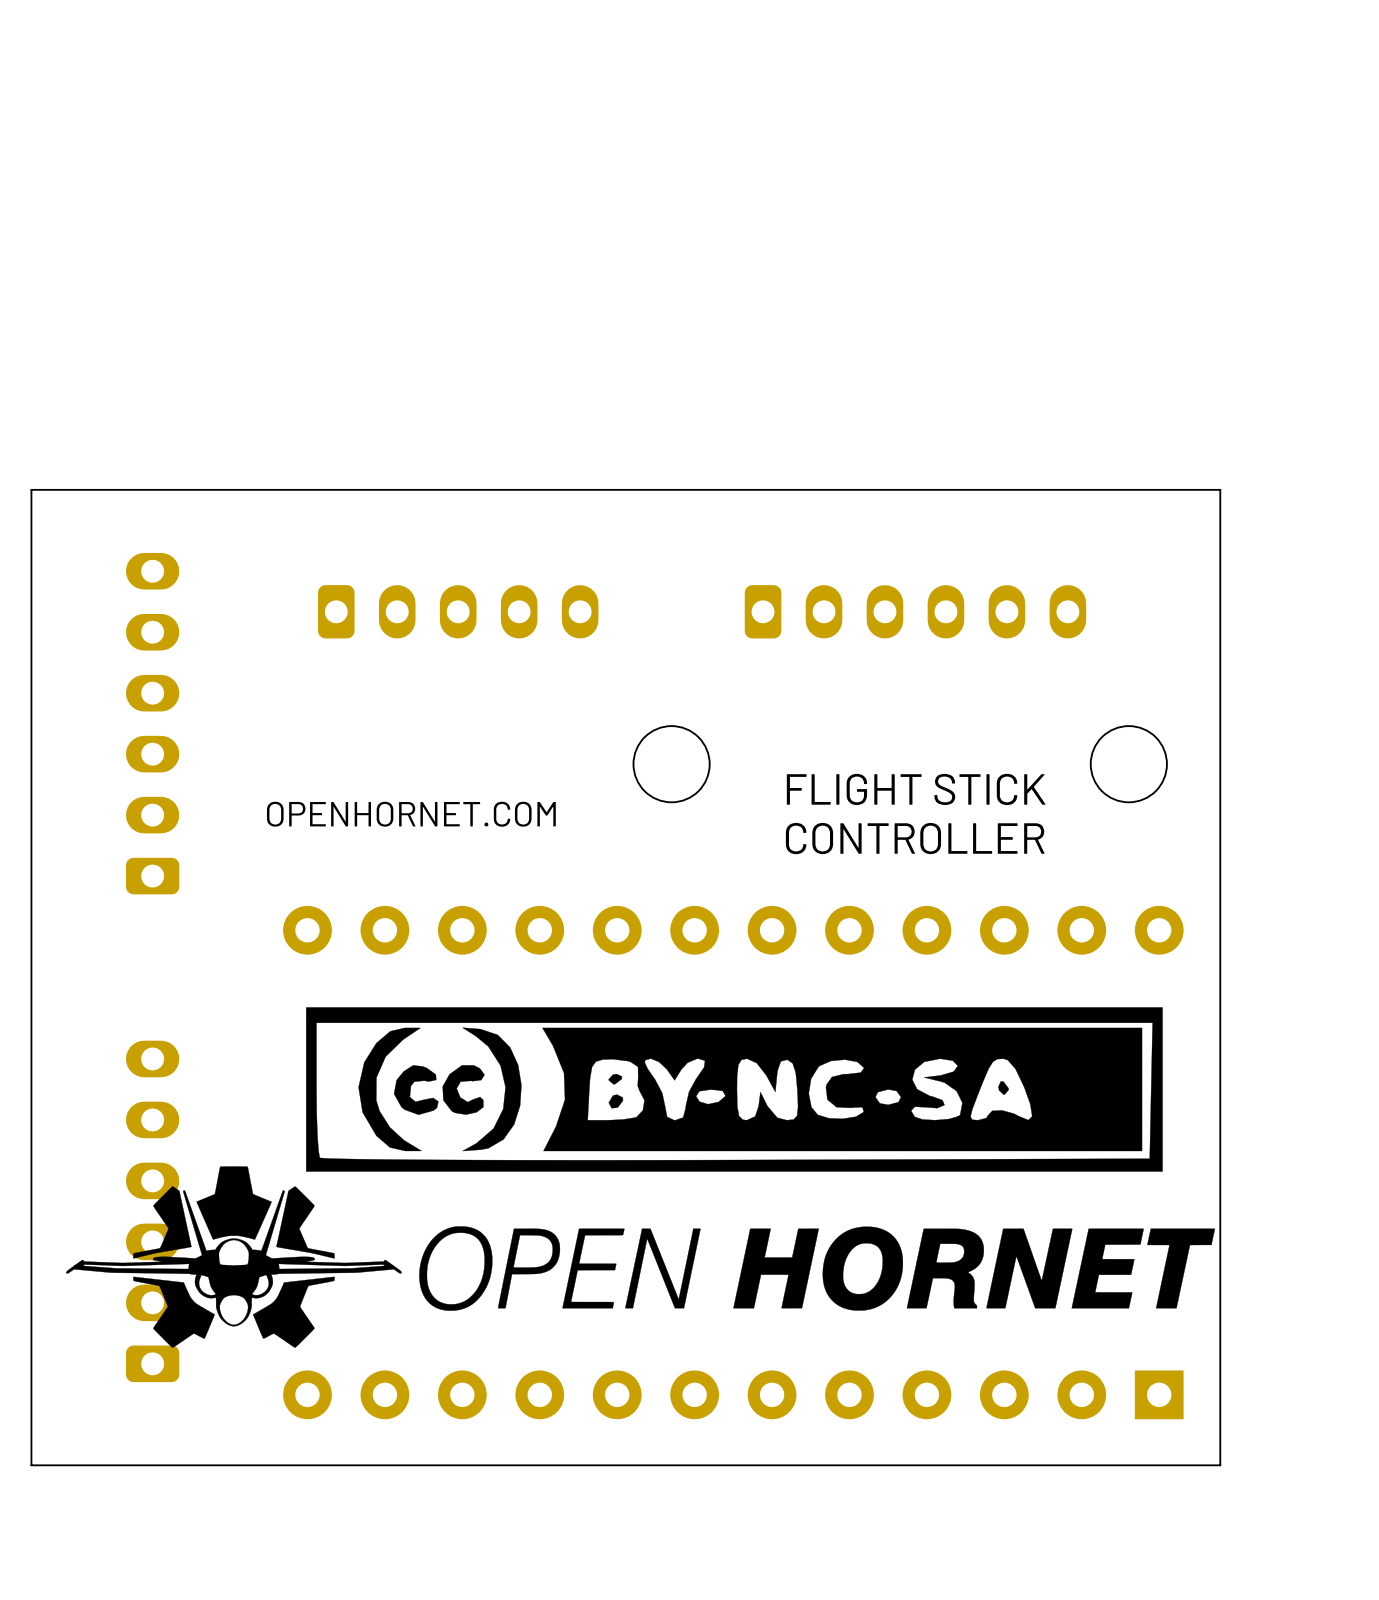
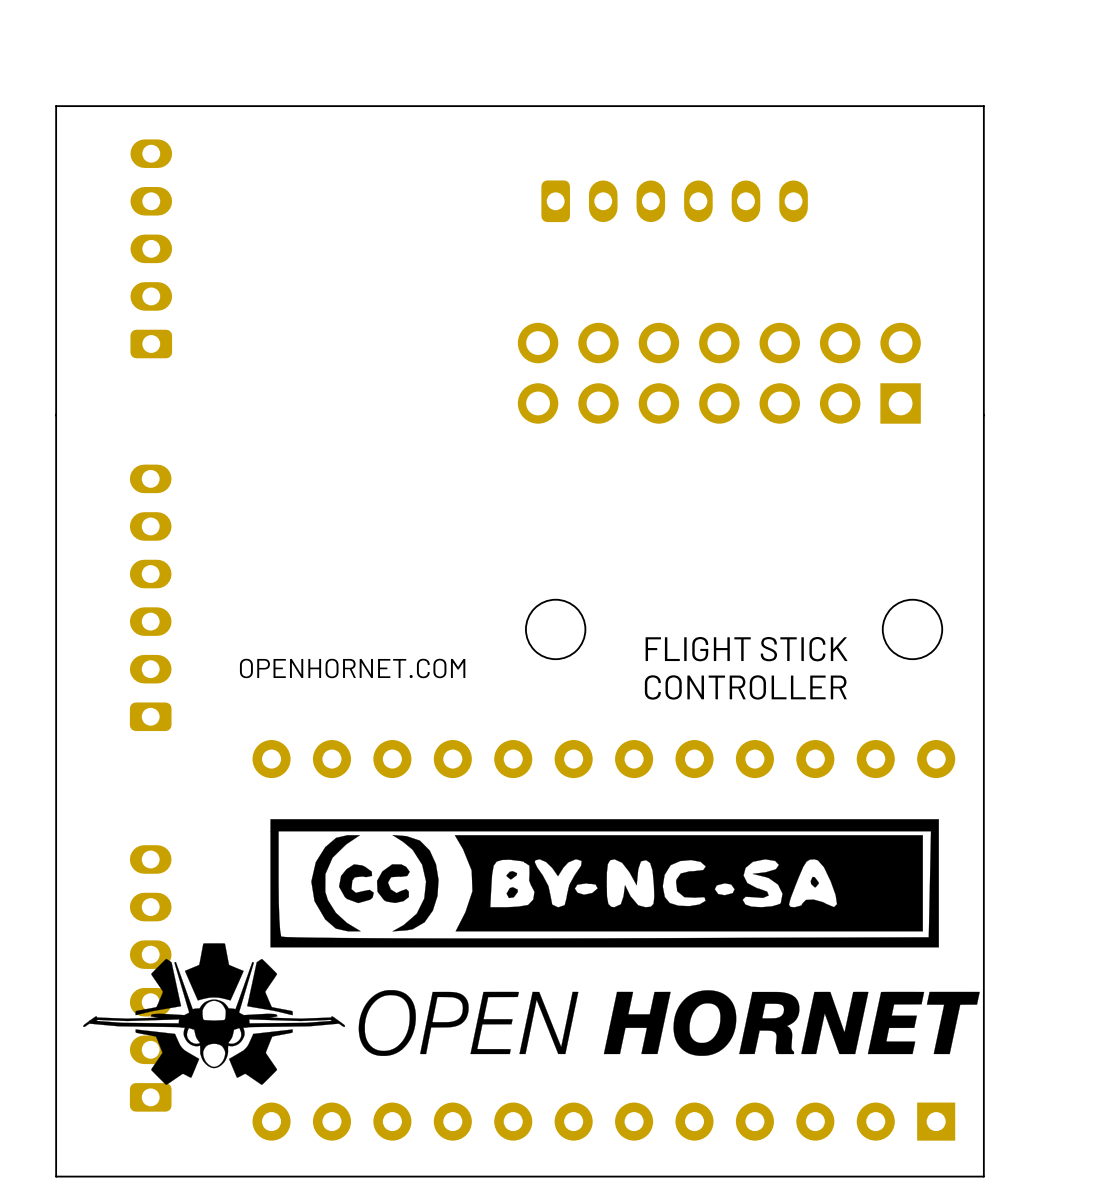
part: none -> (719, 373)
board edge: (1220, 489) (31, 489) -> (983, 415) (983, 106) (56, 106) (56, 415)
part rotation: 0° (458, 611) -> 90° counterclockwise (151, 248)
part position: (458, 611) -> (151, 248)
part position: (915, 611) -> (674, 201)

